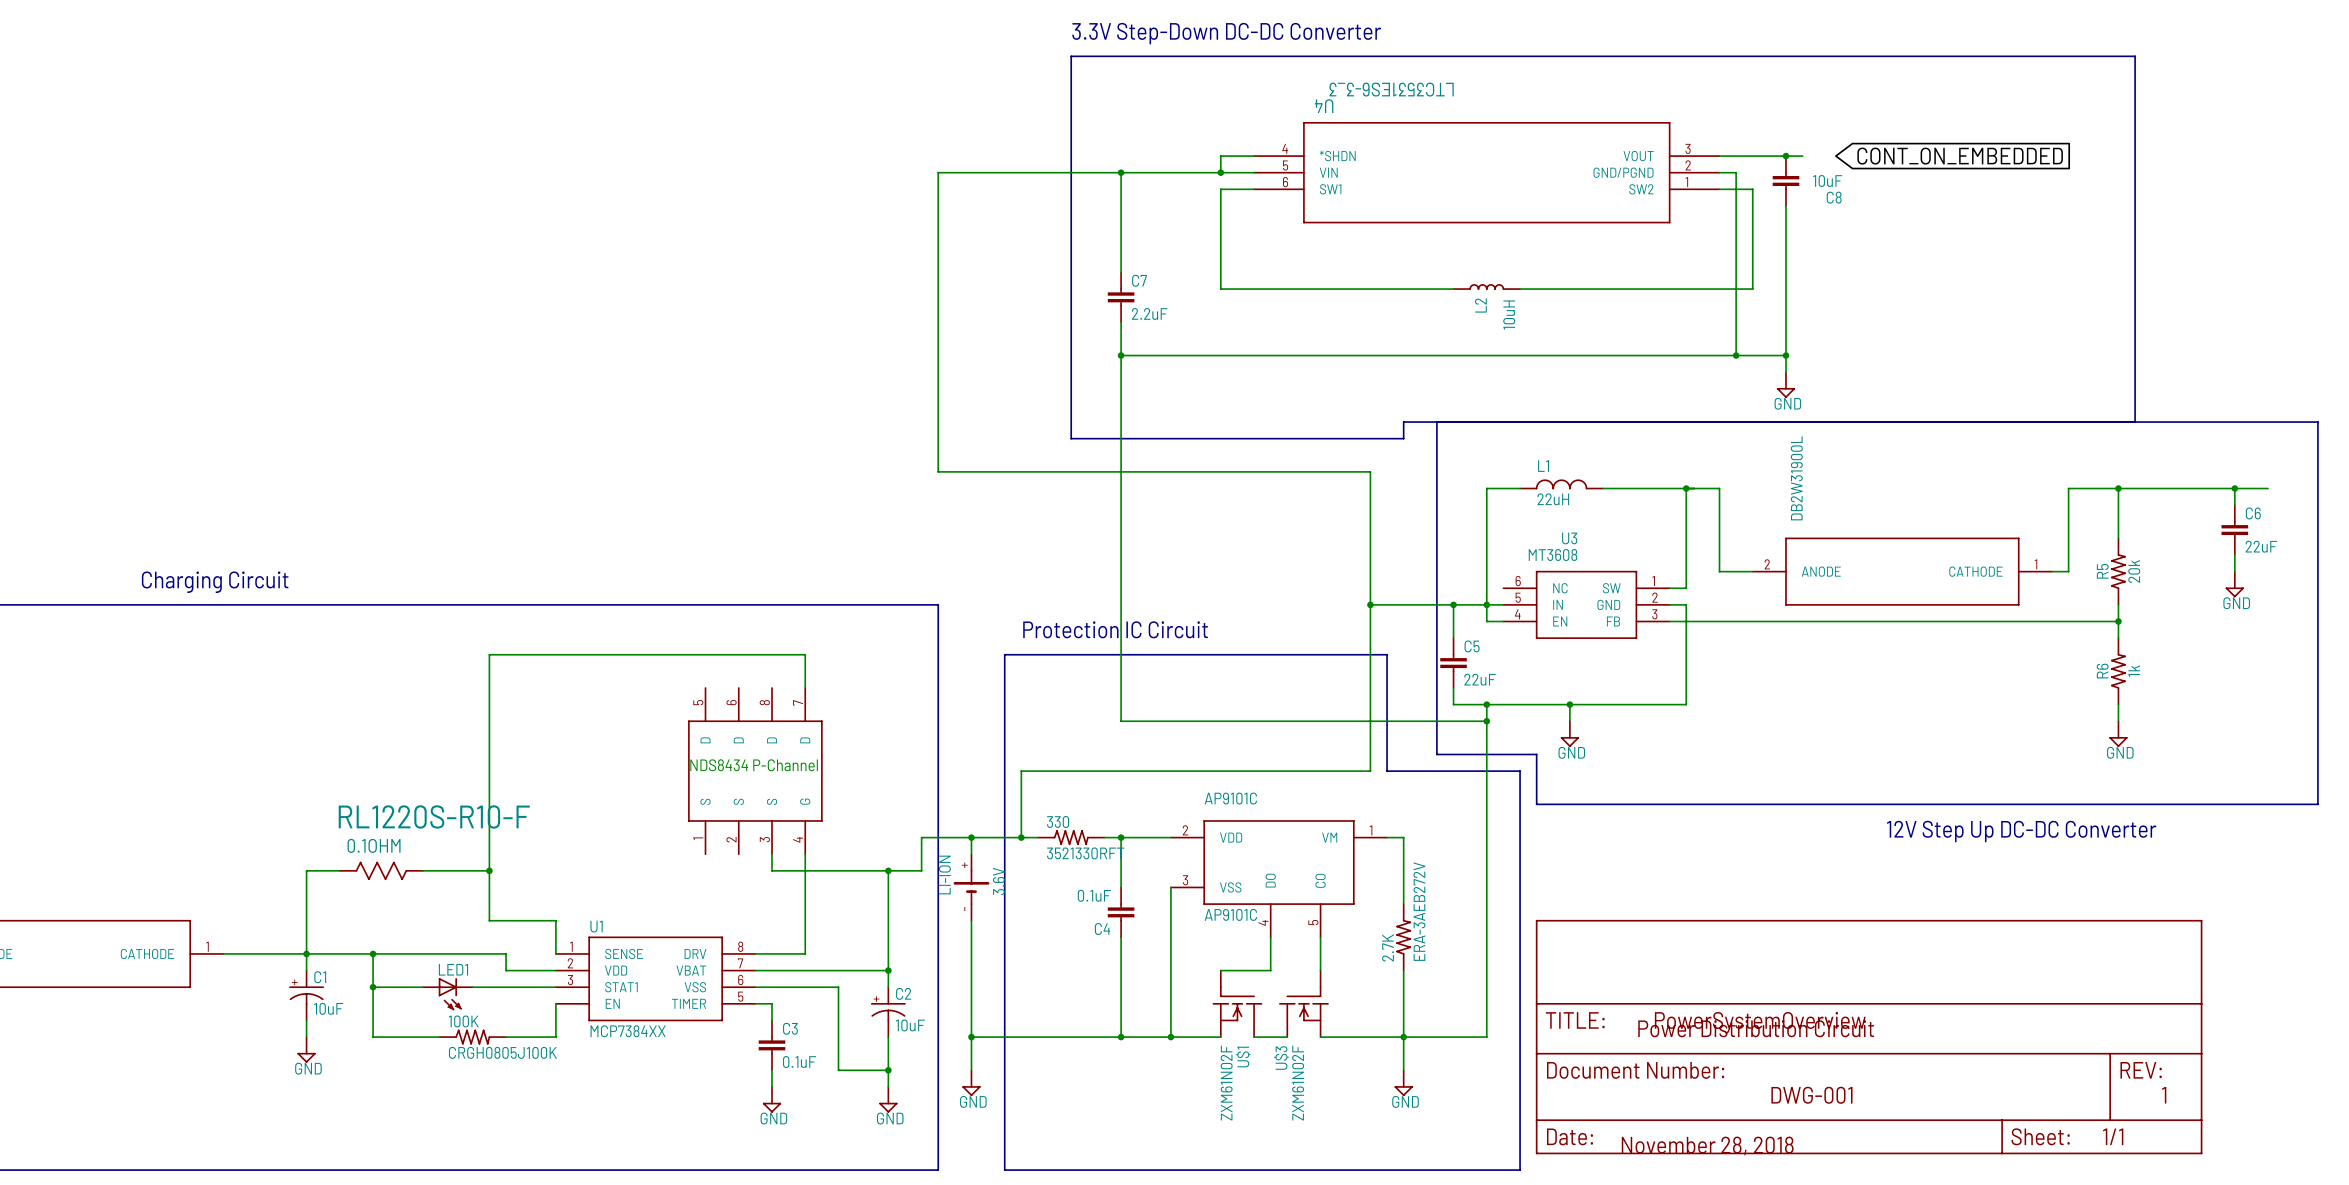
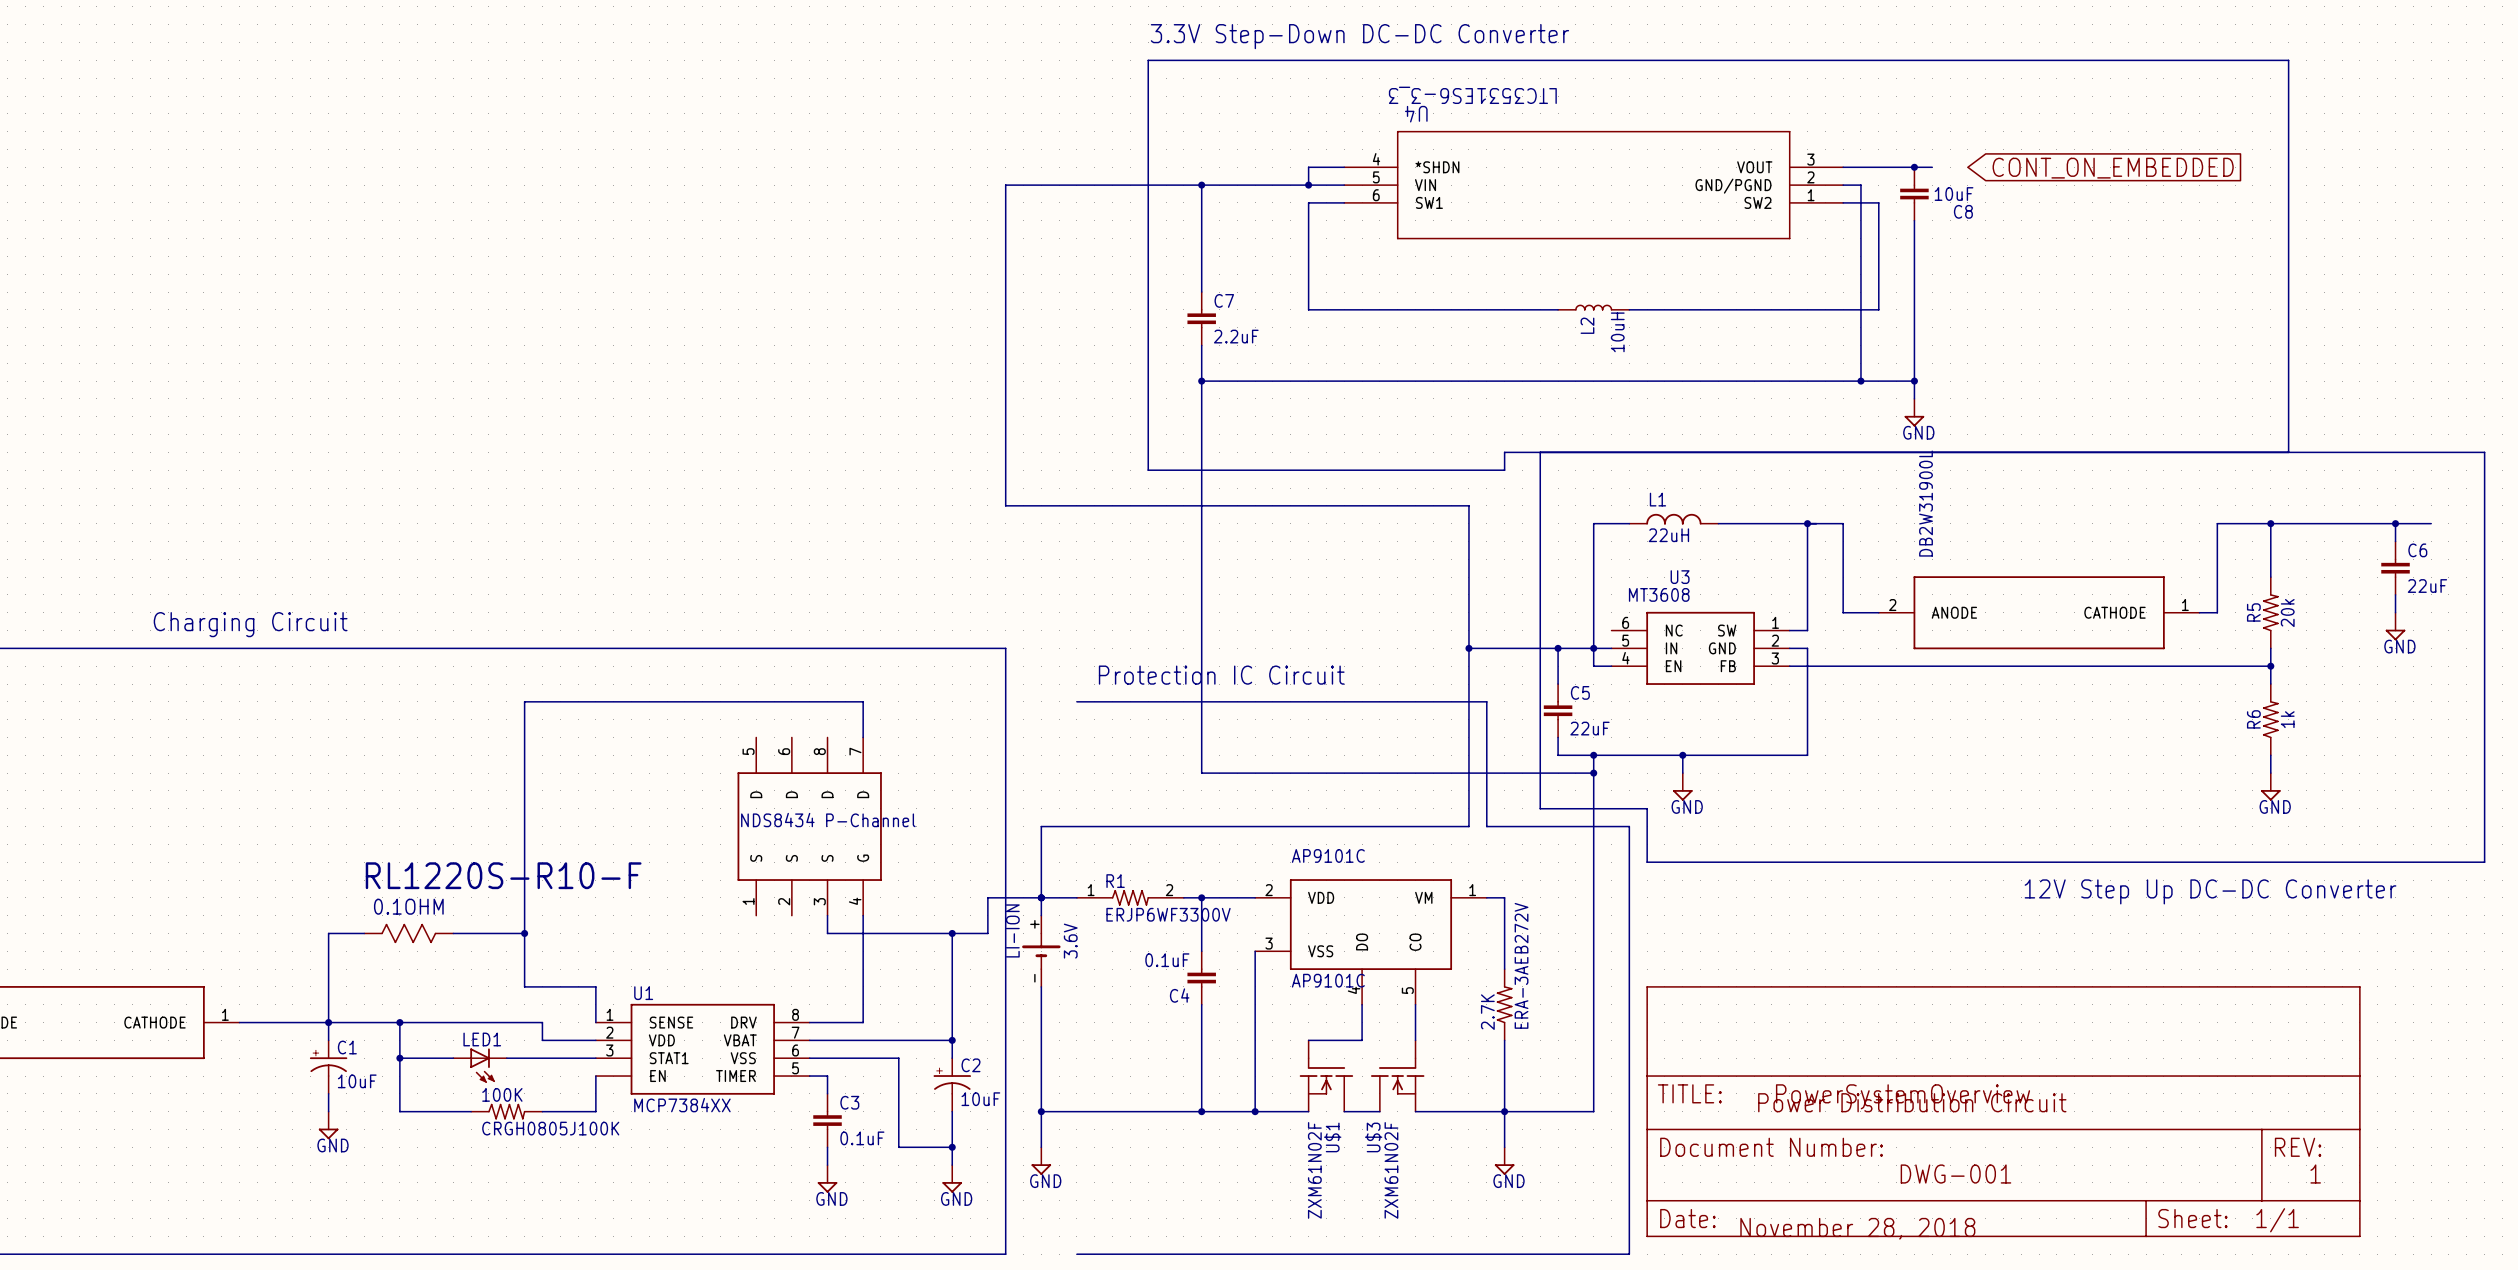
bus: (1004, 654) (1004, 1170) -> none
wire: (1021, 771) (1021, 837) -> (1094, 826) (1041, 826) (1041, 897)
junction: (1021, 837) -> none
R1: none -> ERJP6WF3300V (1130, 897)
330: 3521330RFT (1071, 837) -> none

